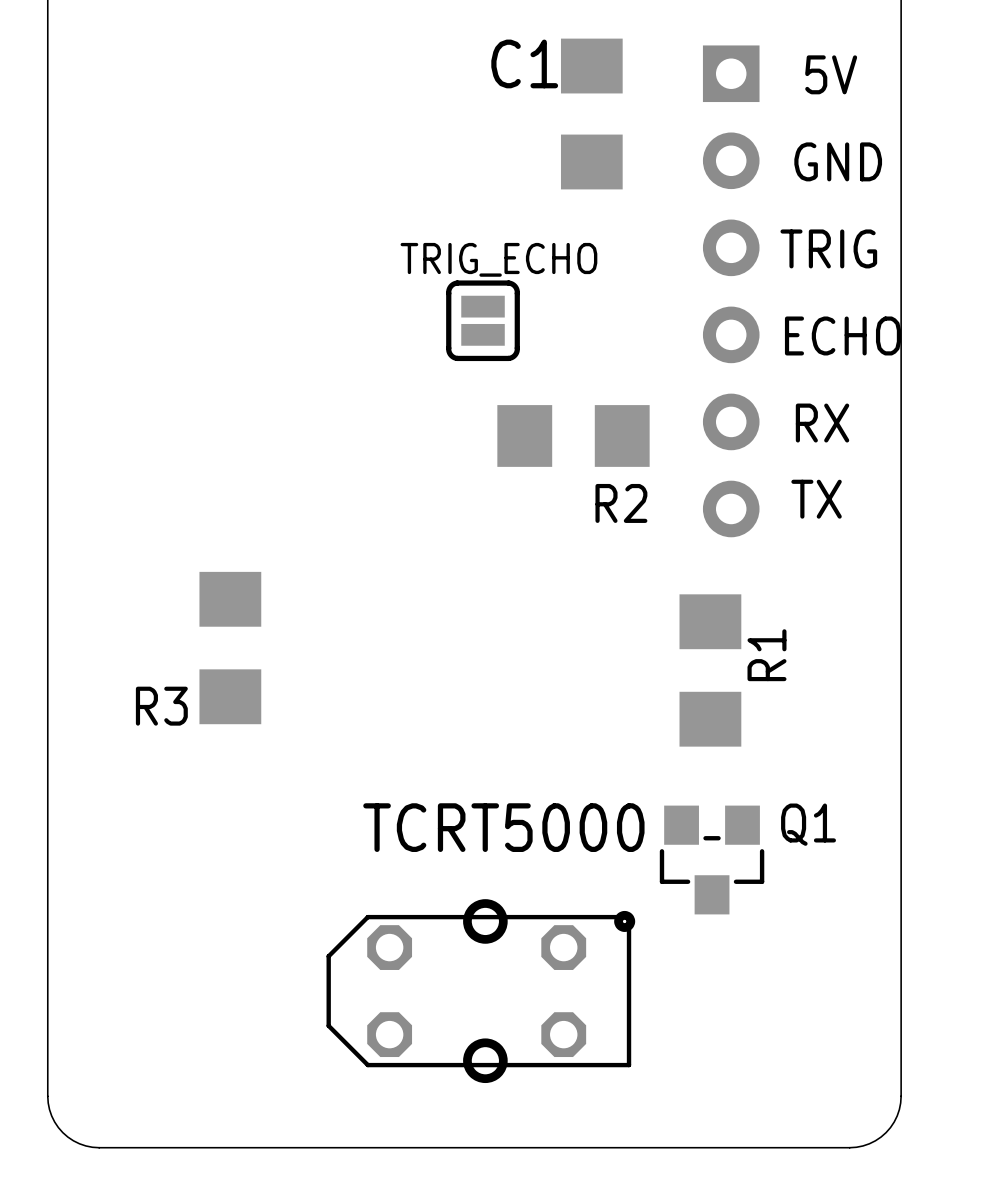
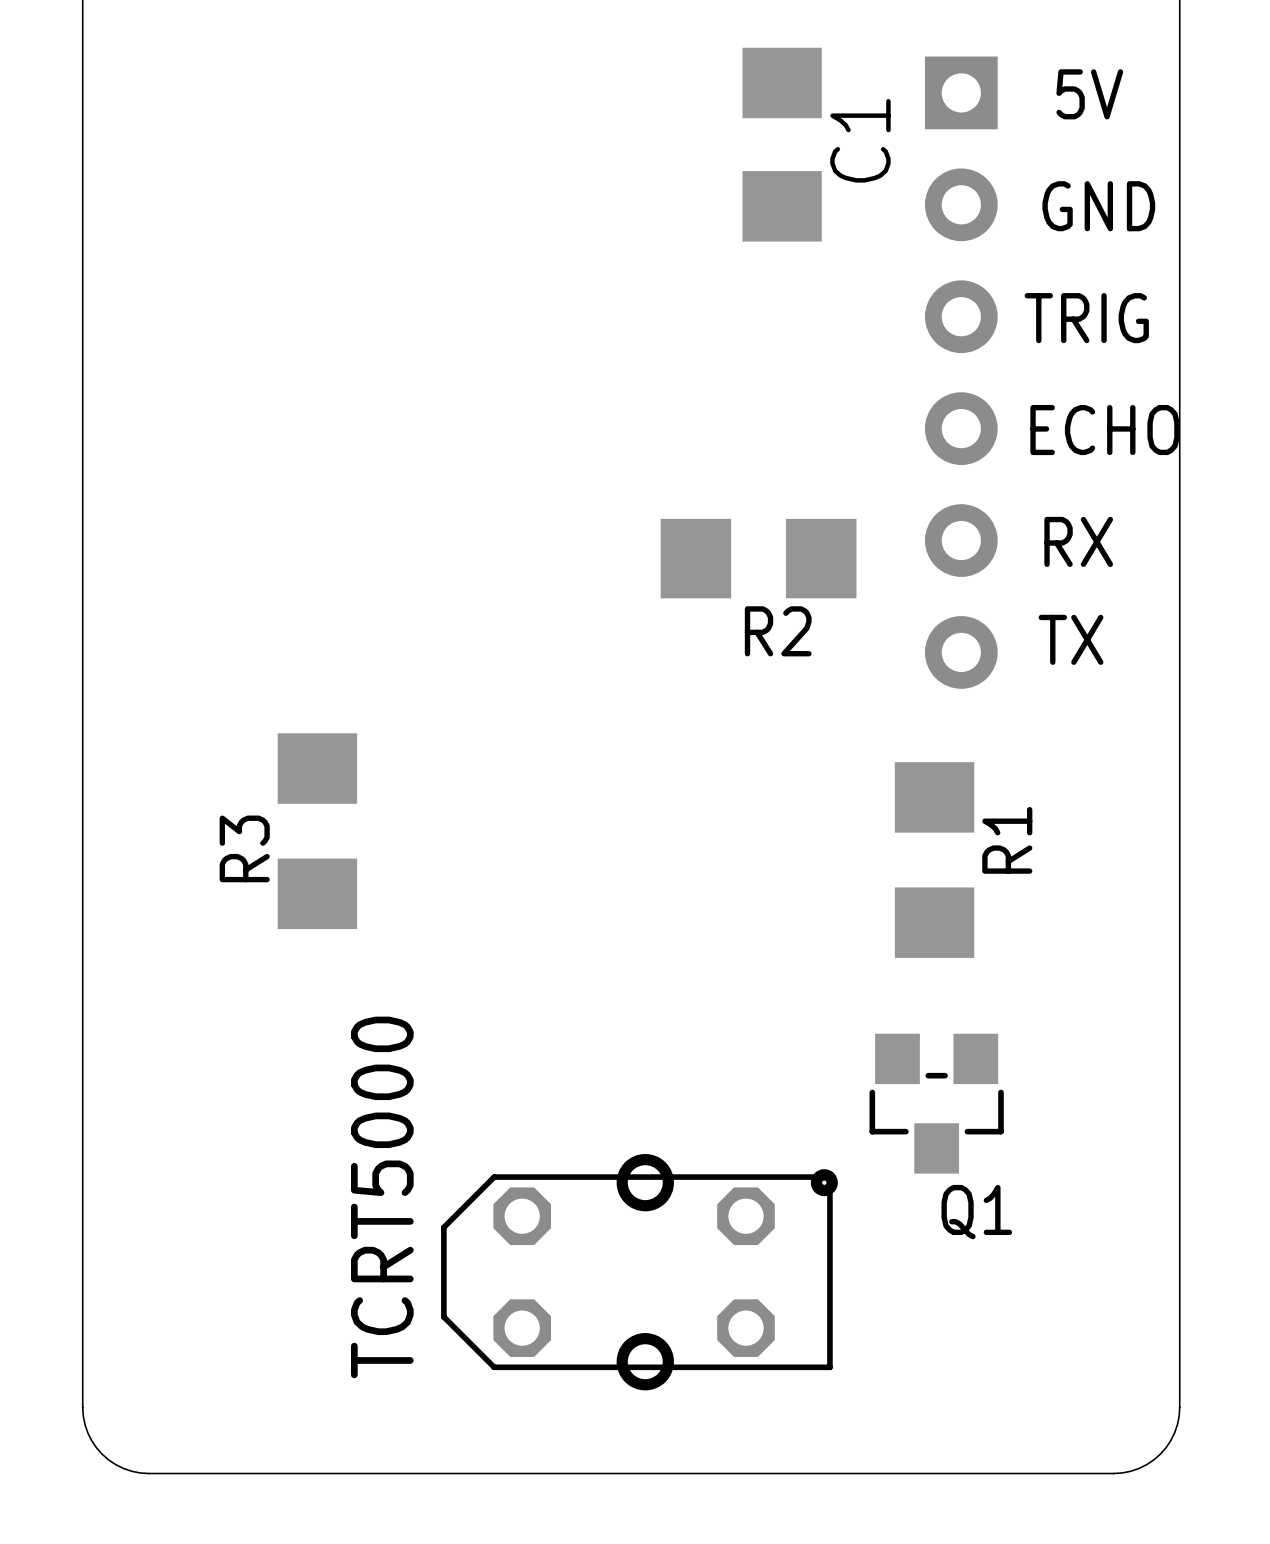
C1 name rotation: 0° (524, 63) -> 90° counterclockwise (860, 140)
C1 name position: C1 (524, 63) -> C1 (860, 140)
TRIG_ECHO: (483, 320) -> none
R2 name position: R2 (621, 503) -> R2 (778, 631)
R3 name rotation: 0° (161, 706) -> 90° counterclockwise (244, 848)
Q1 name position: Q1 (808, 824) -> Q1 (976, 1212)
TCRT5000 name rotation: 0° (503, 827) -> 90° counterclockwise (382, 1197)

